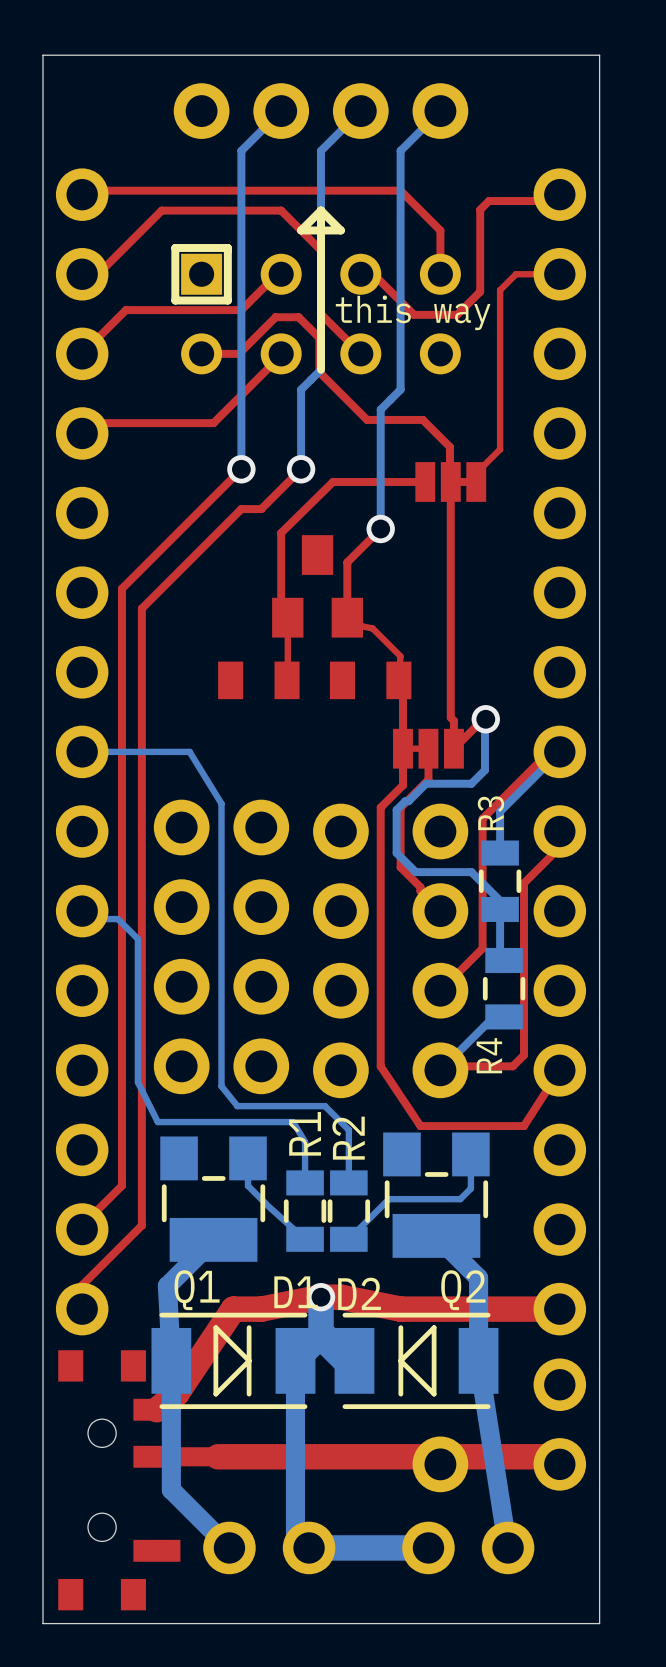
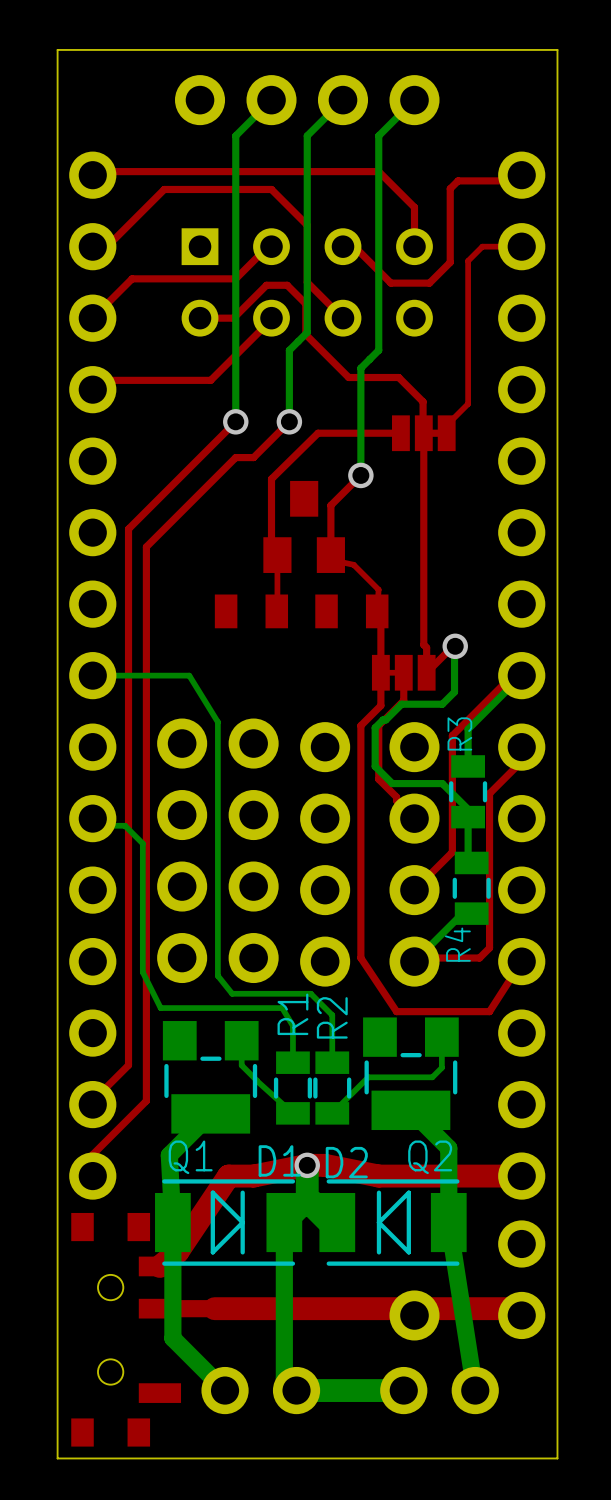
line: (321, 210) (321, 369) -> none
line: (321, 210) (340, 230) (301, 230) (321, 210) -> none
line: (227, 247) (227, 300) (175, 300) (175, 247) (227, 247) -> none
text: this way (413, 312) -> none

